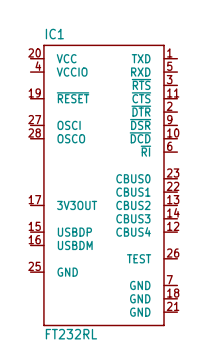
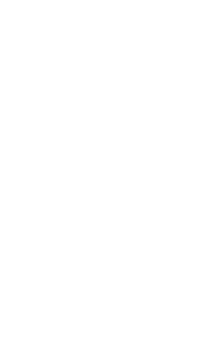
IC1: FT232RL (103, 185) -> none

